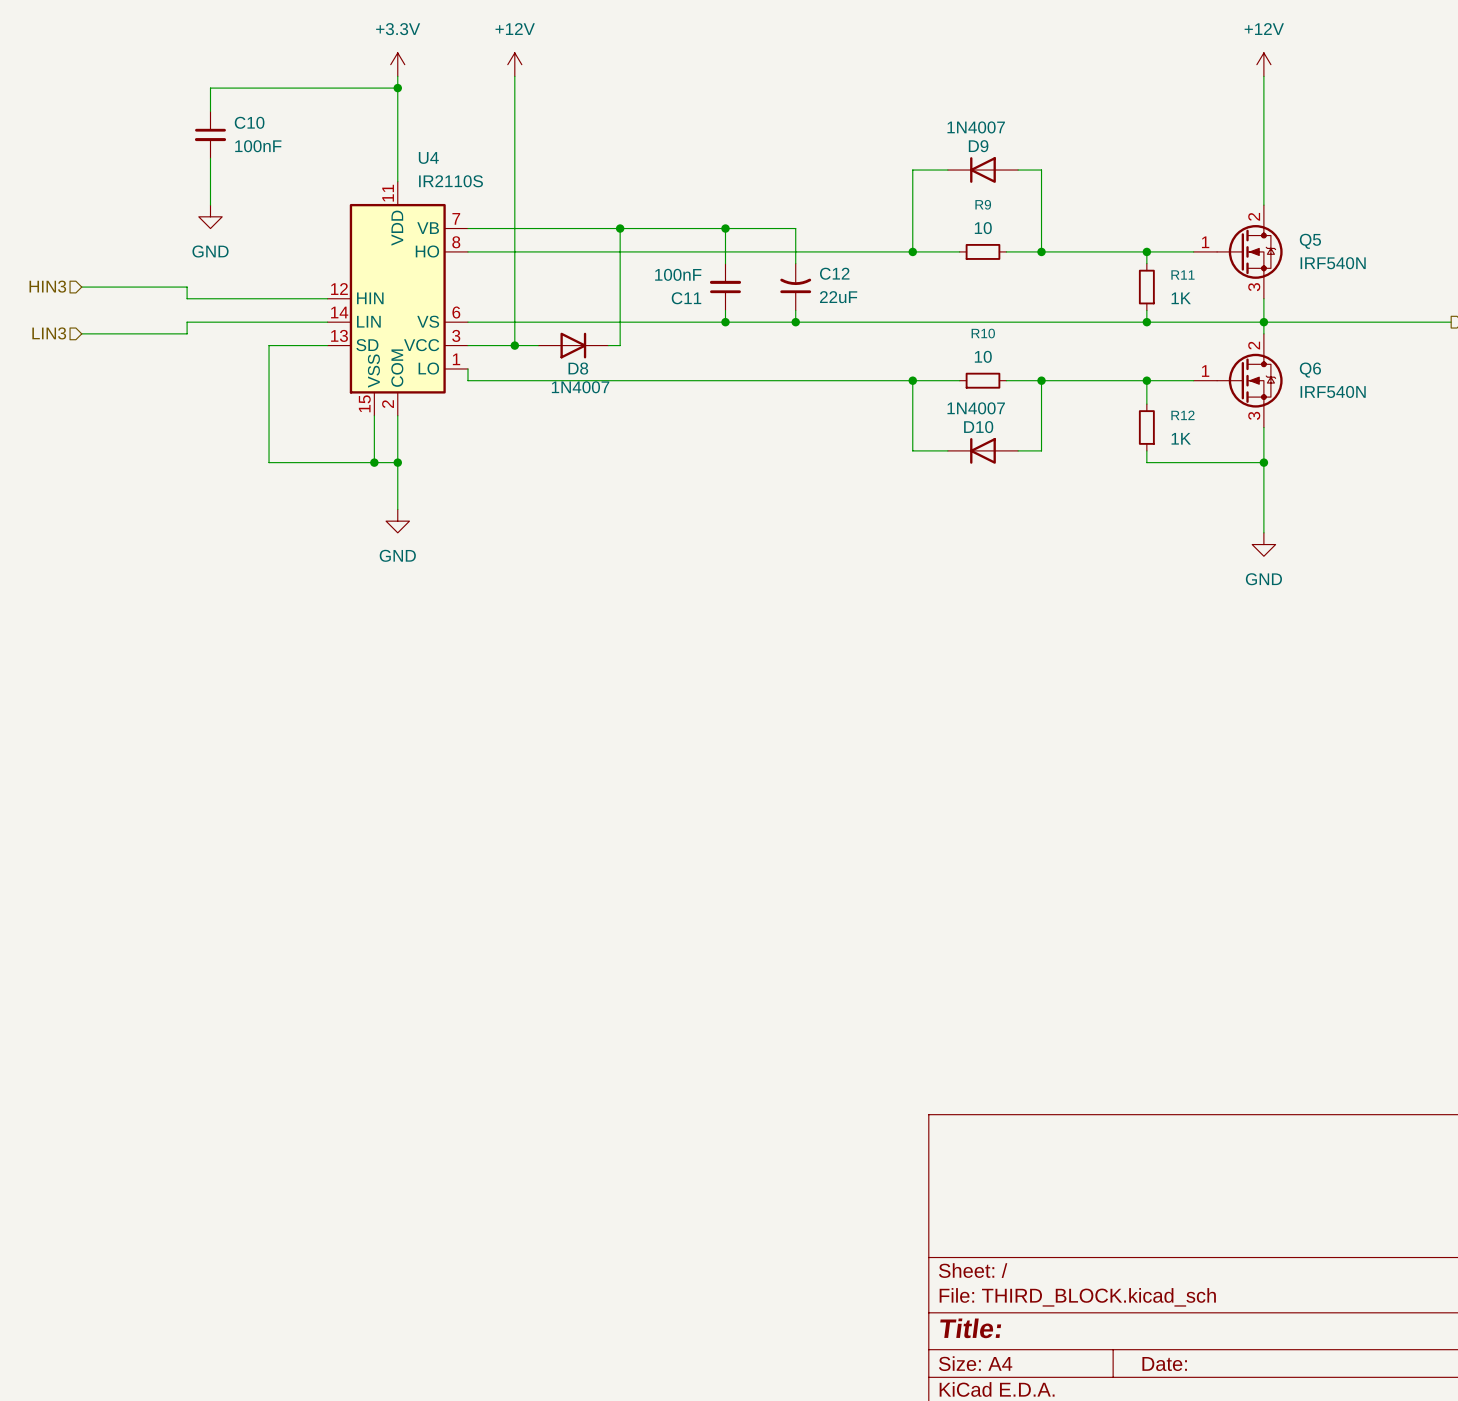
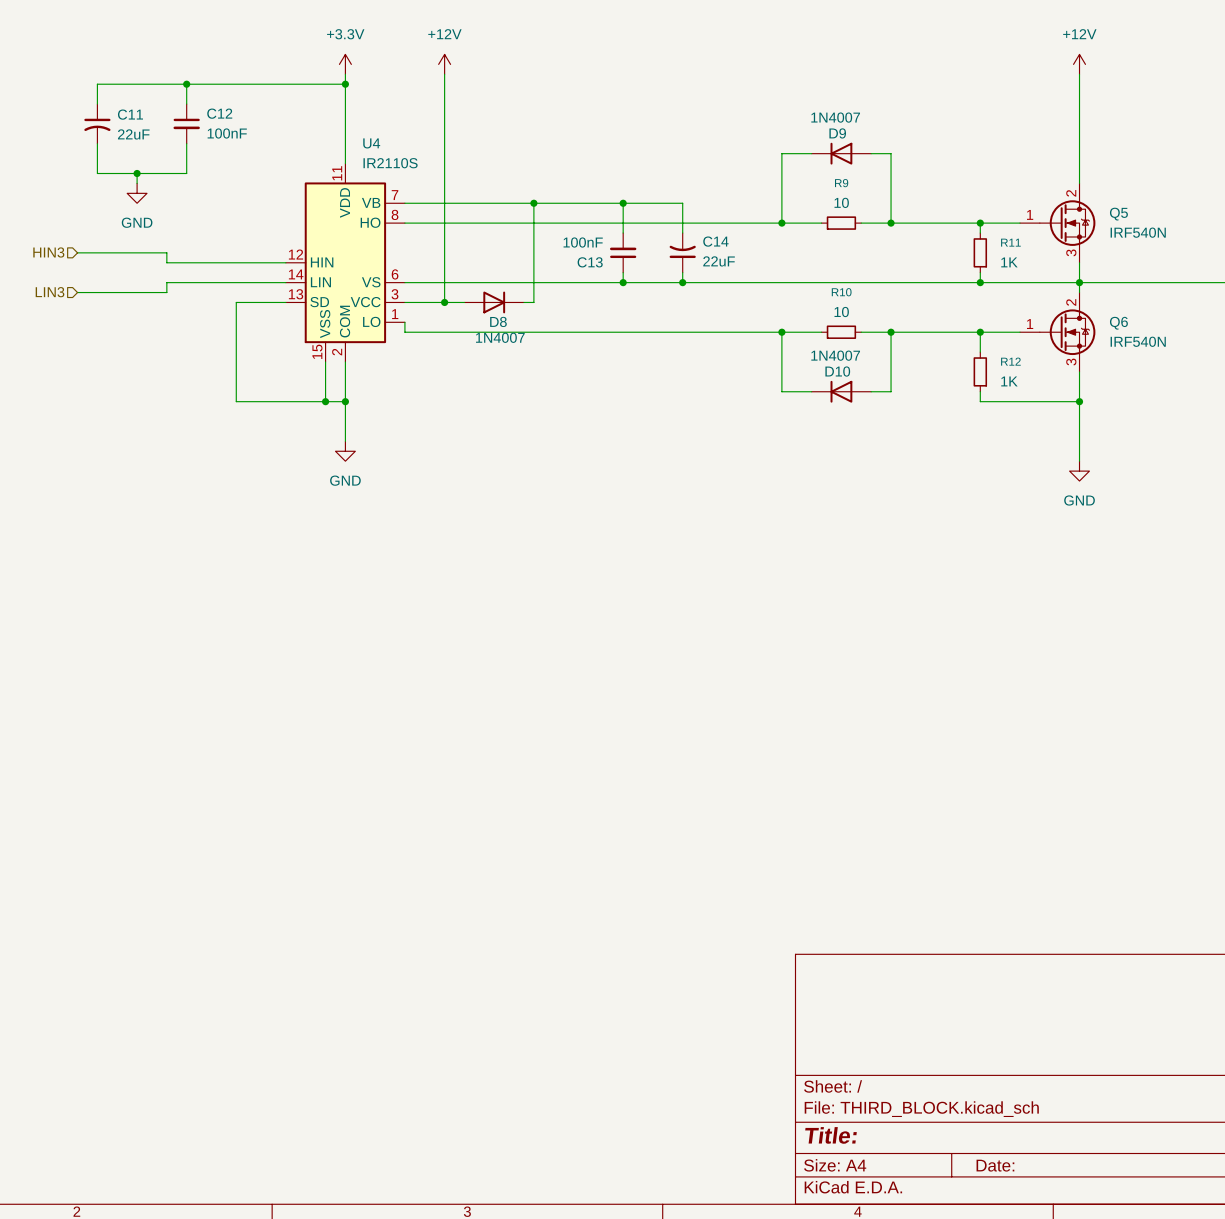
wire: none -> (186, 84) (97, 84) (97, 104)
junction: none -> (186, 84)
C10 name: C10 (249, 122) -> C12 (219, 113)
C11: none -> 22uF (97, 123)
wire: none -> (137, 173) (137, 183)
junction: none -> (137, 173)
wire: (210, 193) (210, 205) -> (186, 173) (97, 173) (97, 143)
power symbol position: GND (210, 216) -> GND (137, 193)
C12 name: C12 (834, 273) -> C14 (715, 241)
C11 name: C11 (686, 298) -> C13 (590, 262)

